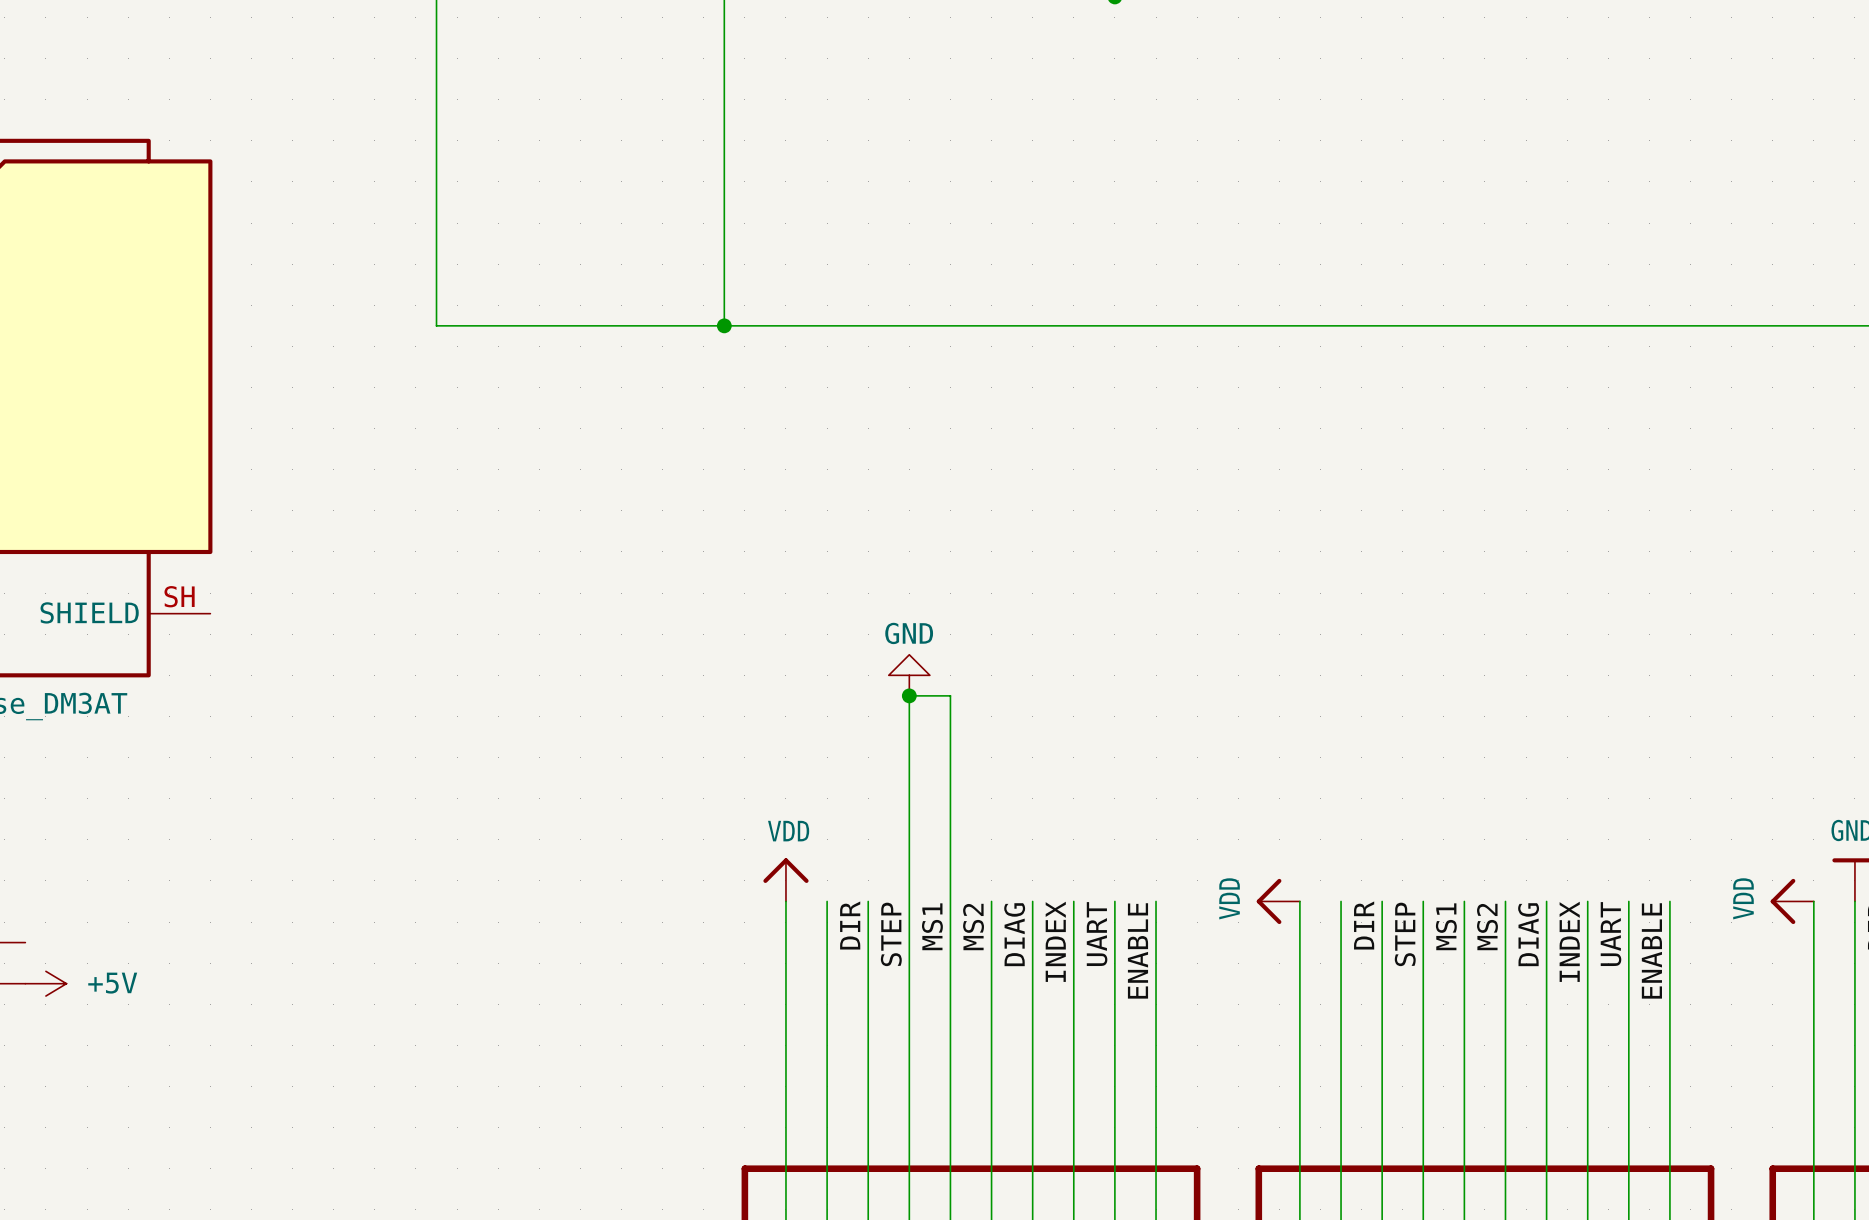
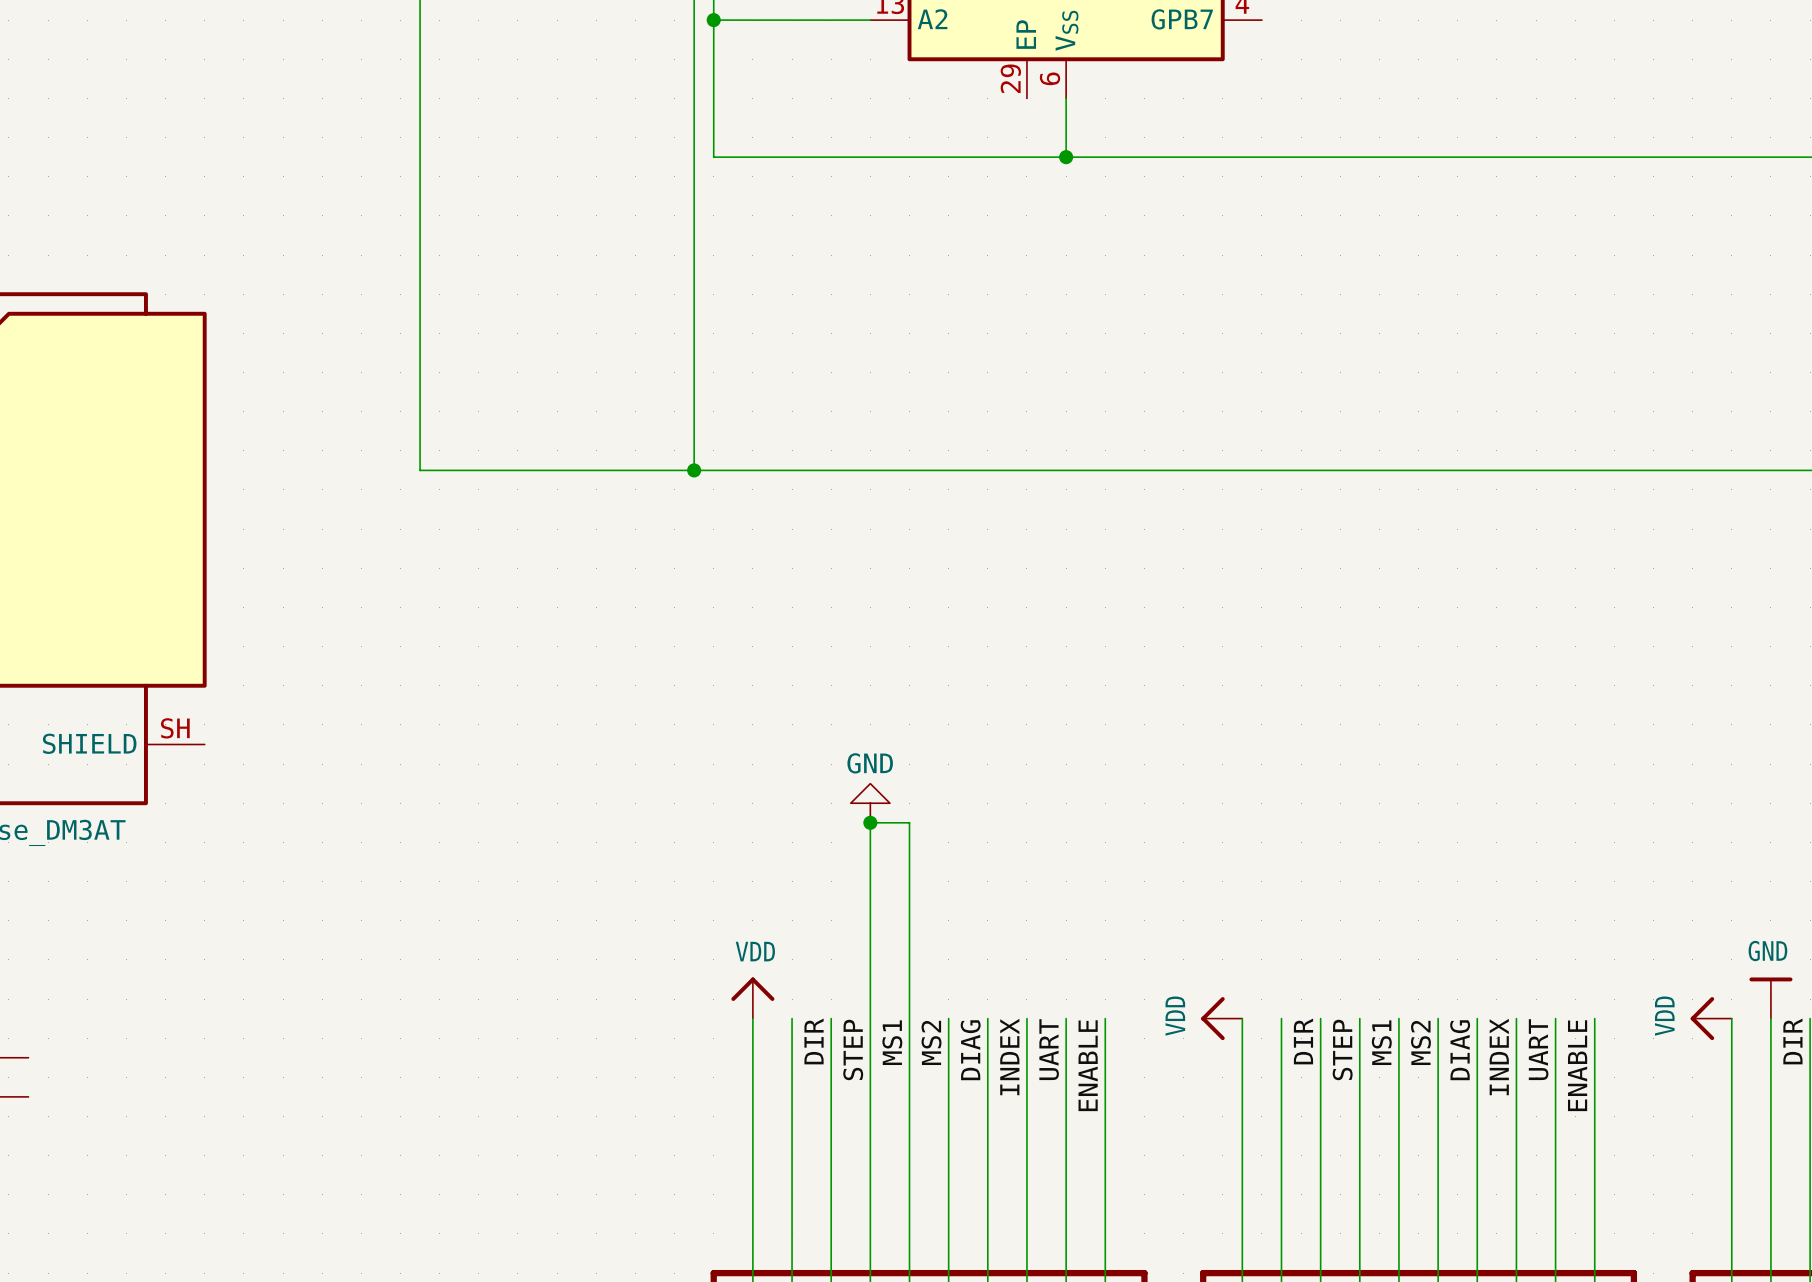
power symbol: +5V (45, 983) -> none

